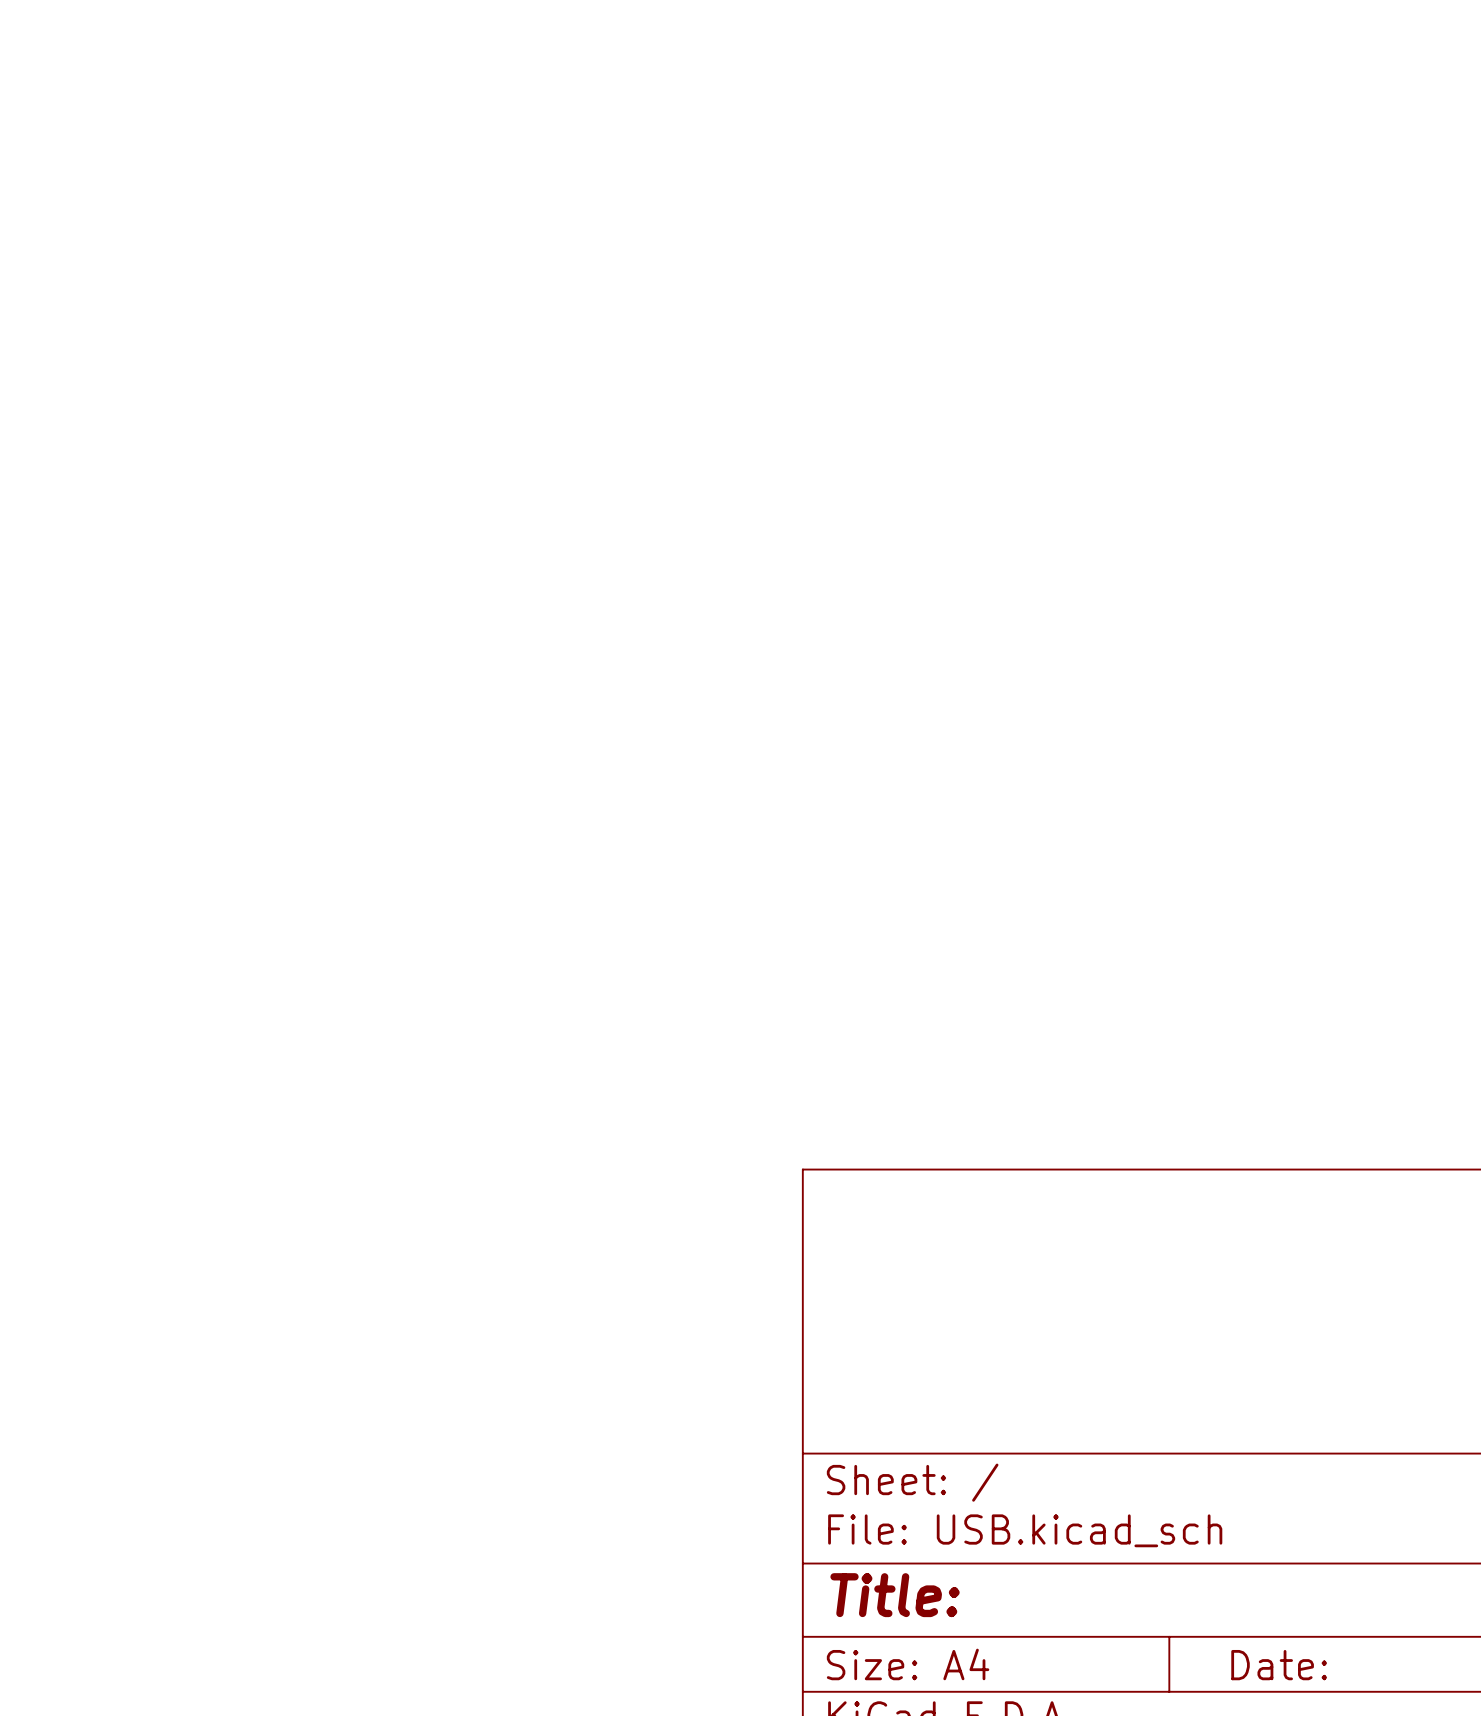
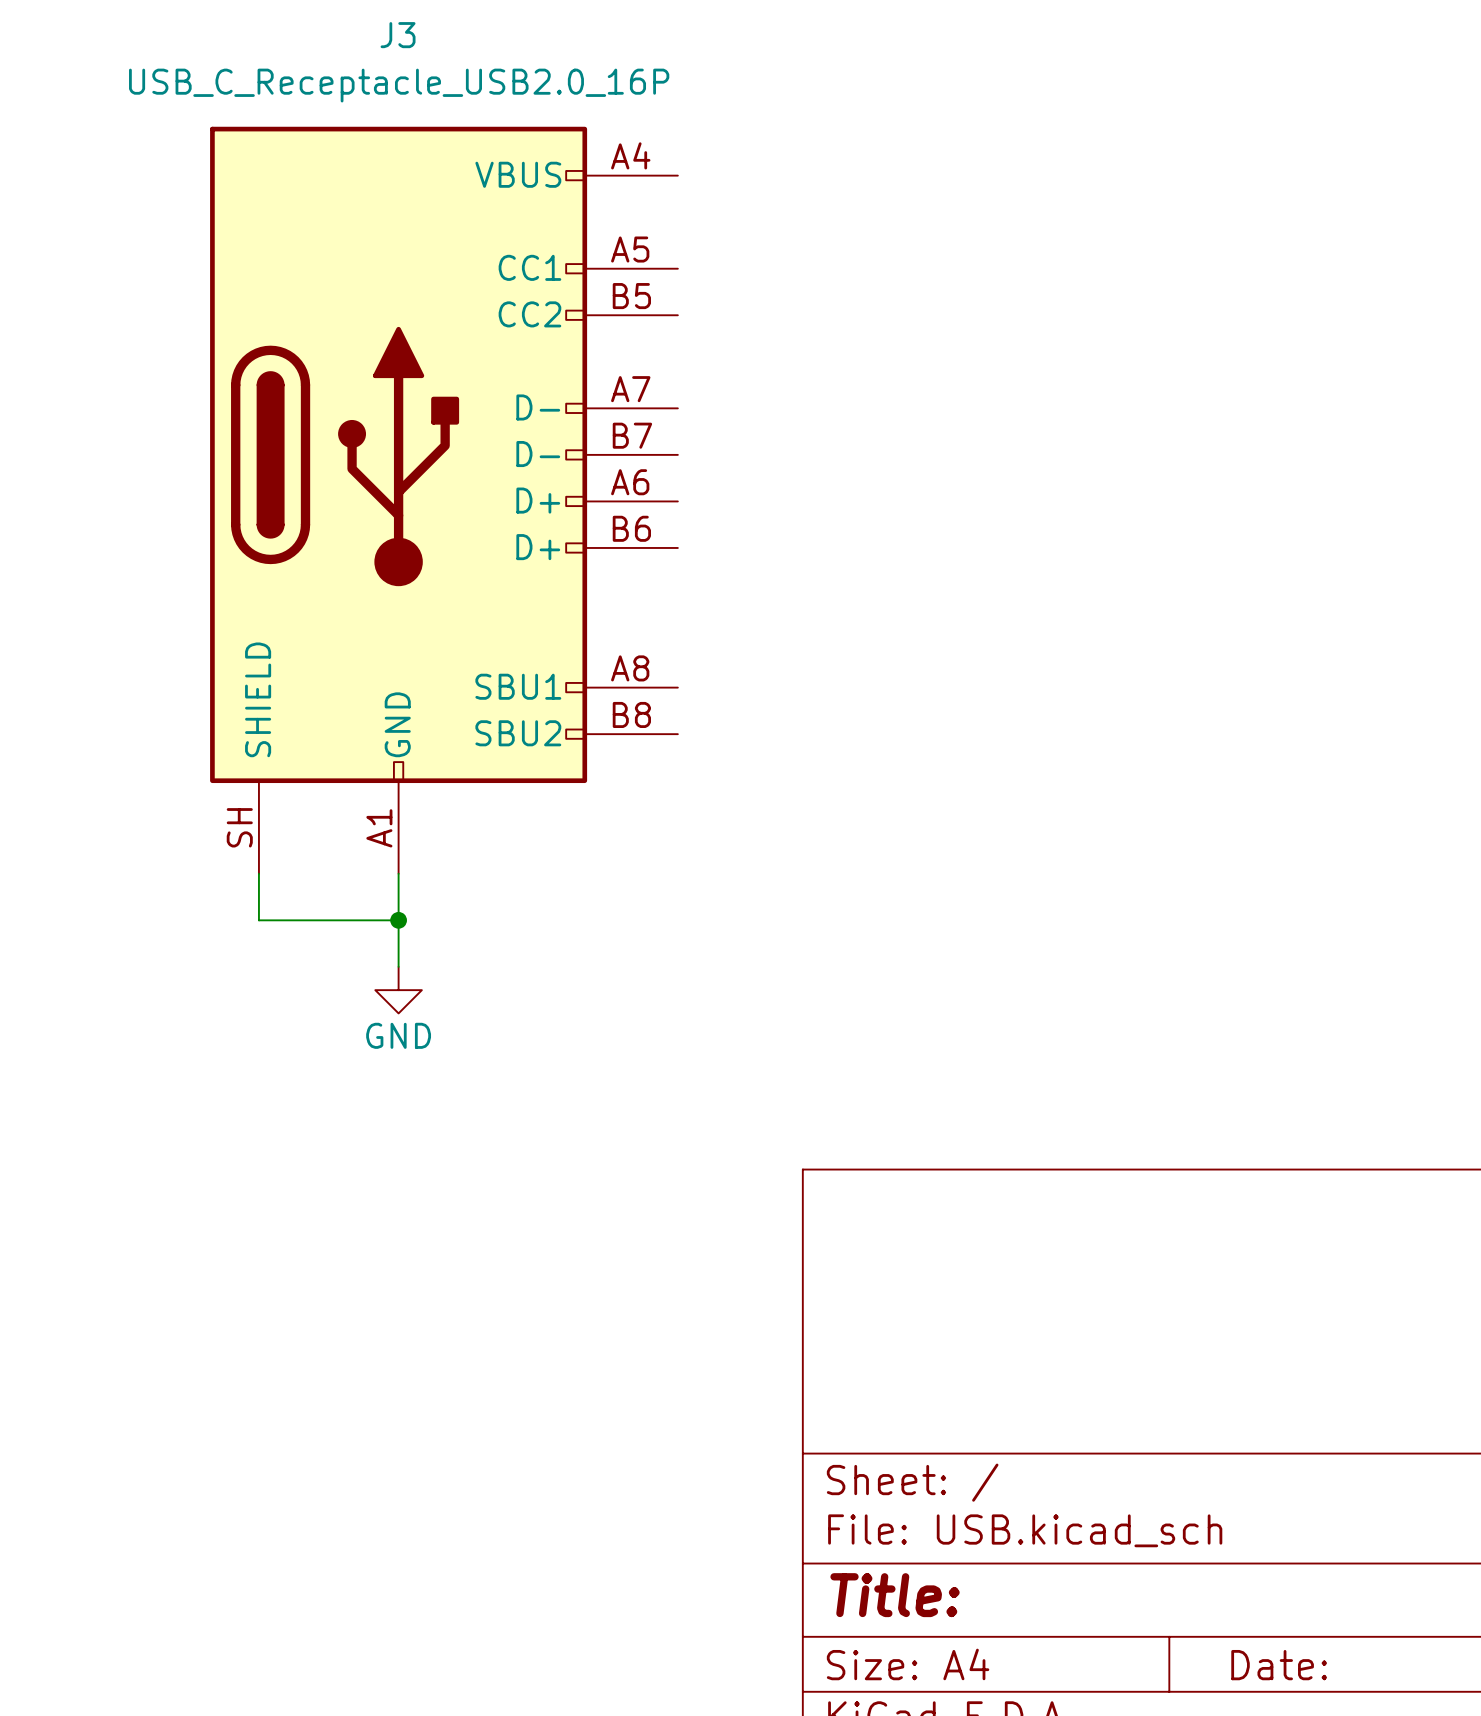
J3: none -> USB_C_Receptacle_USB2.0_16P (443, 500)
wire: none -> (258, 873) (258, 920) (398, 920)
wire: none -> (398, 873) (398, 966)
junction: none -> (398, 920)
power symbol: none -> GND (398, 990)

